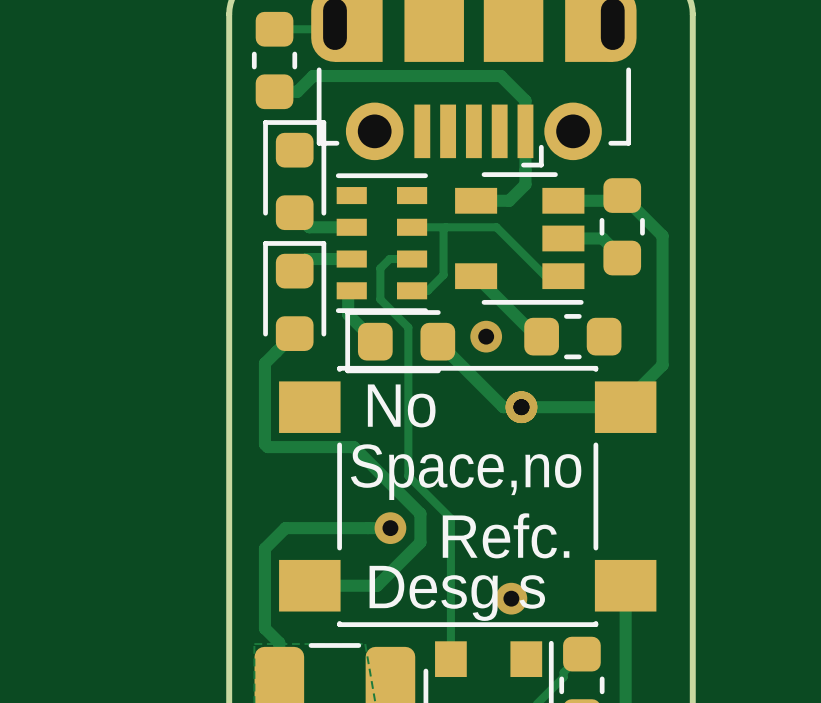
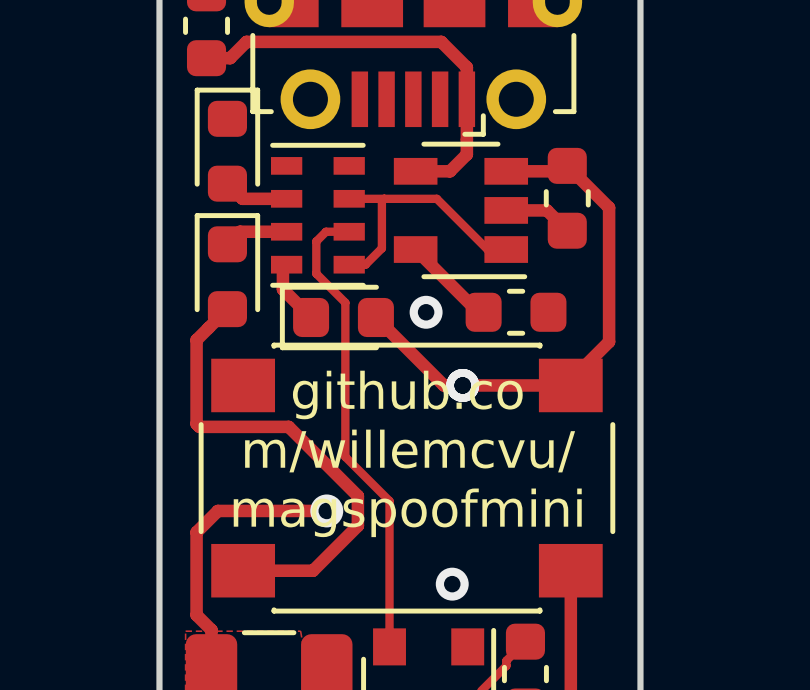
part footprint: [279, 365, 657, 628] -> [198, 342, 616, 614]
text: No (401, 405) -> none
text: none -> github.co (407, 394)
text: Space,no (466, 472) -> m/willemcvu/ (410, 451)
text: none -> magspoofmini (407, 512)
text: Refc. (506, 535) -> none
text: Desg s (457, 593) -> none

